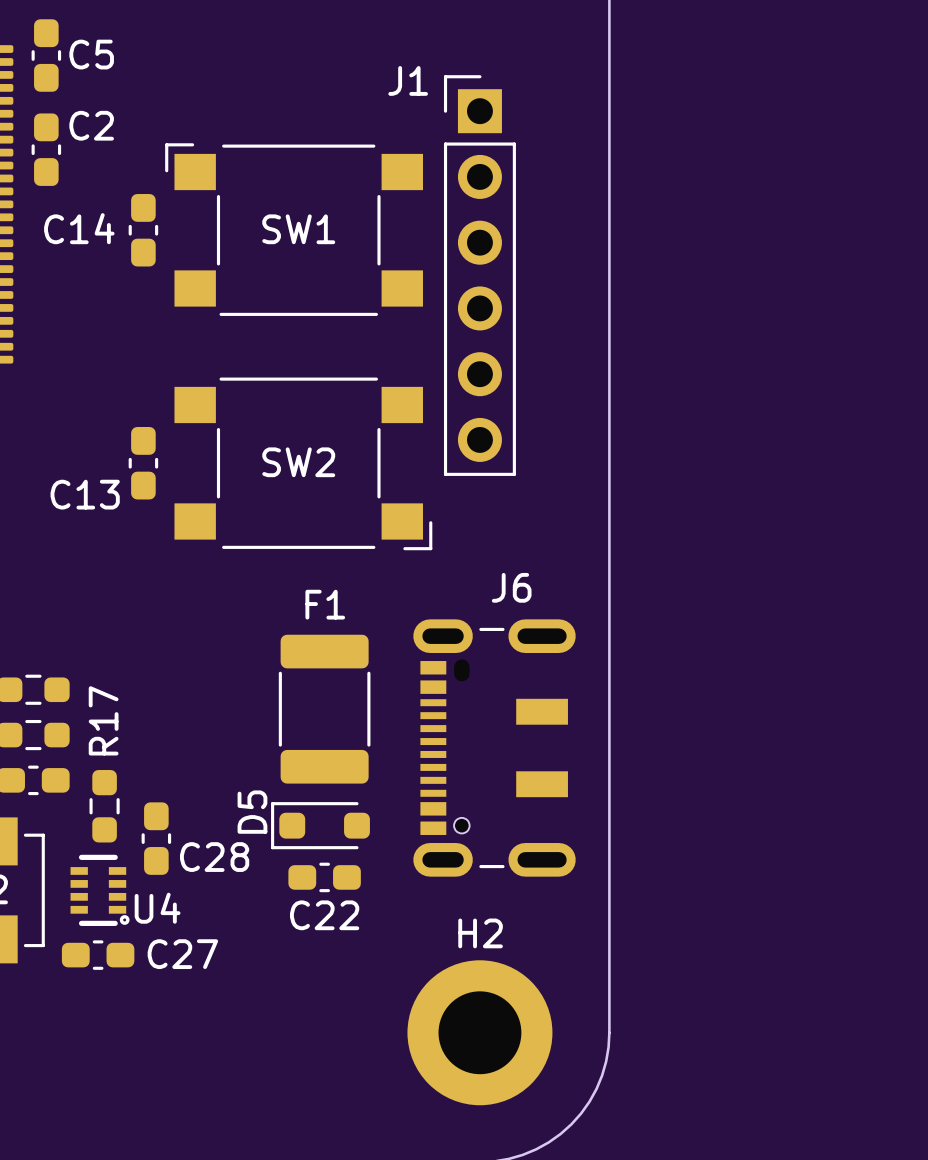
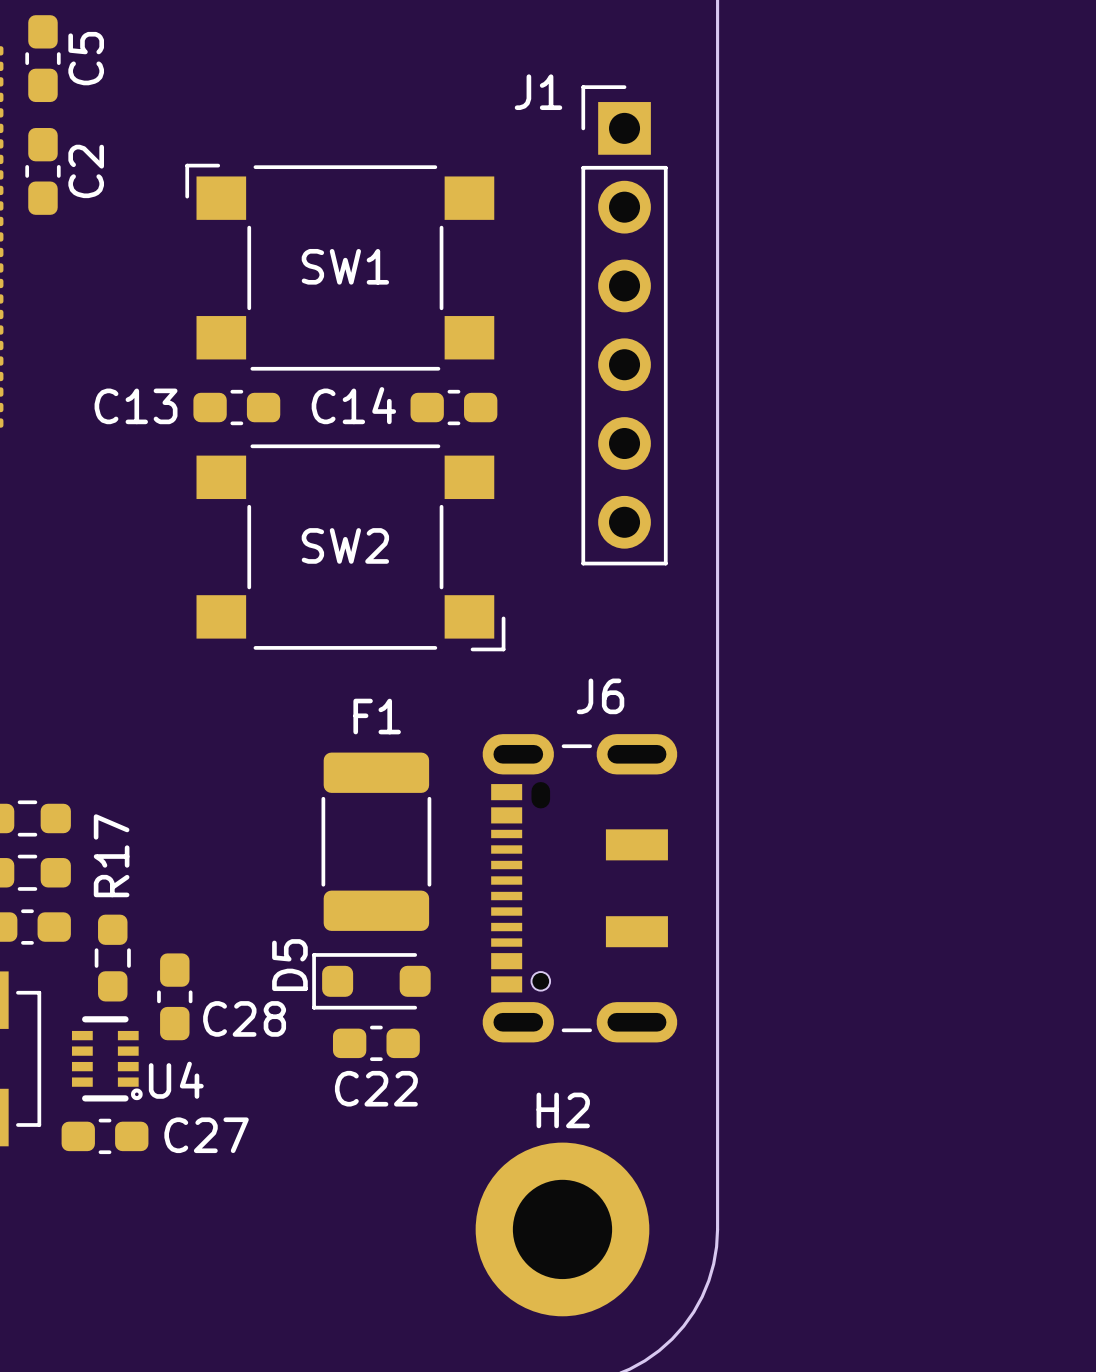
C5 name rotation: 0° (91, 54) -> 90° counterclockwise (86, 58)
C2 name rotation: 0° (91, 125) -> 90° counterclockwise (86, 171)
C14 rotation: 0° (143, 230) -> 90° clockwise (453, 407)
C14 position: (143, 230) -> (453, 407)
J1 position: (479, 275) -> (624, 325)
C13 rotation: 0° (143, 463) -> 90° clockwise (236, 407)
C13 position: (143, 463) -> (236, 407)

